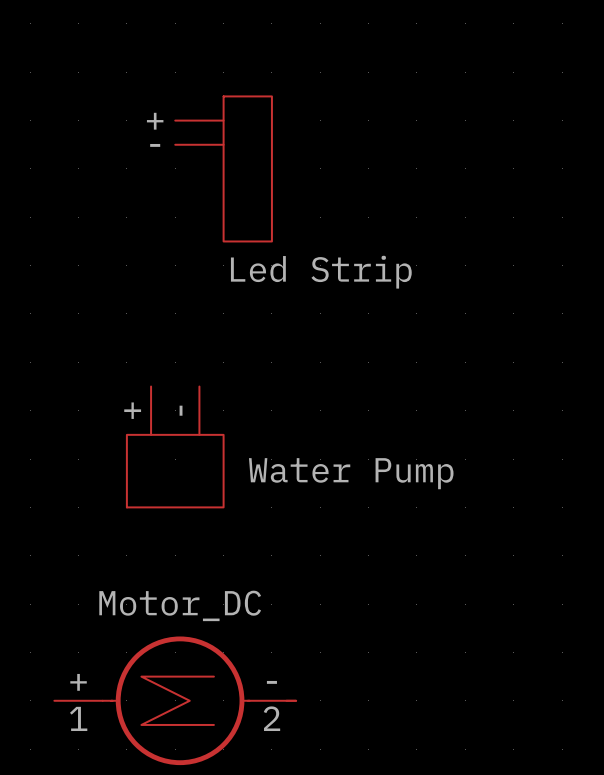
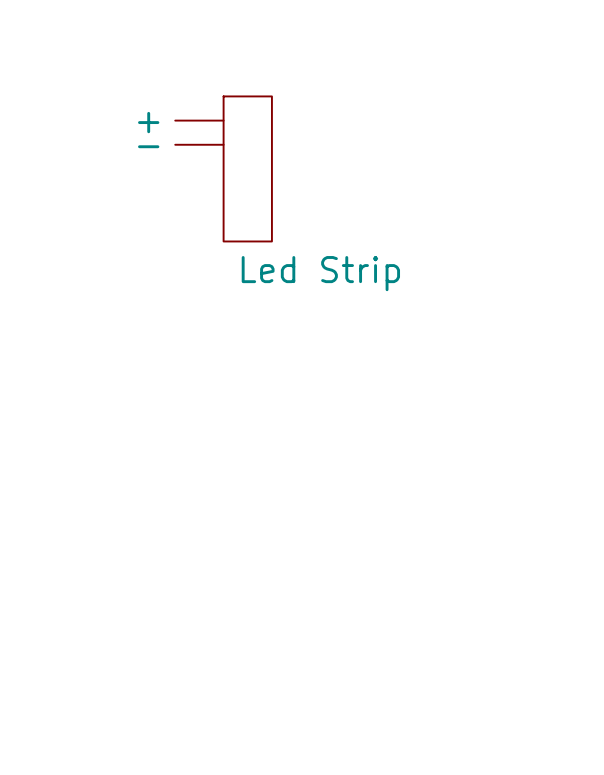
part: Water Pump (175, 446) -> none
part: Motor_DC (175, 700) -> none

